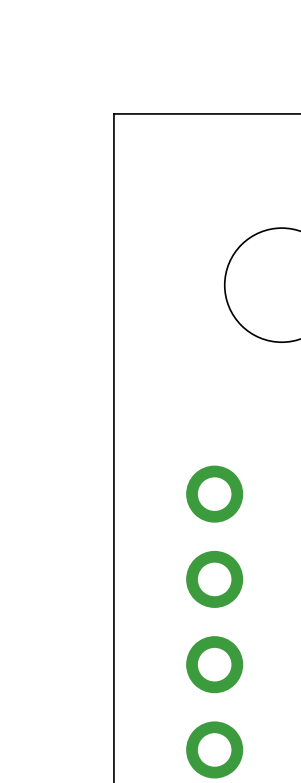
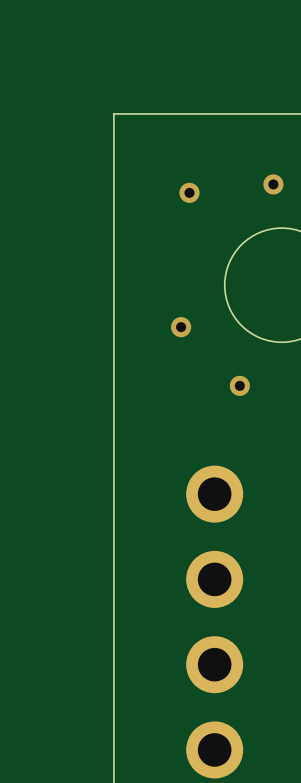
via: none -> (273, 184)
via: none -> (189, 192)
via: none -> (181, 327)
via: none -> (239, 385)

